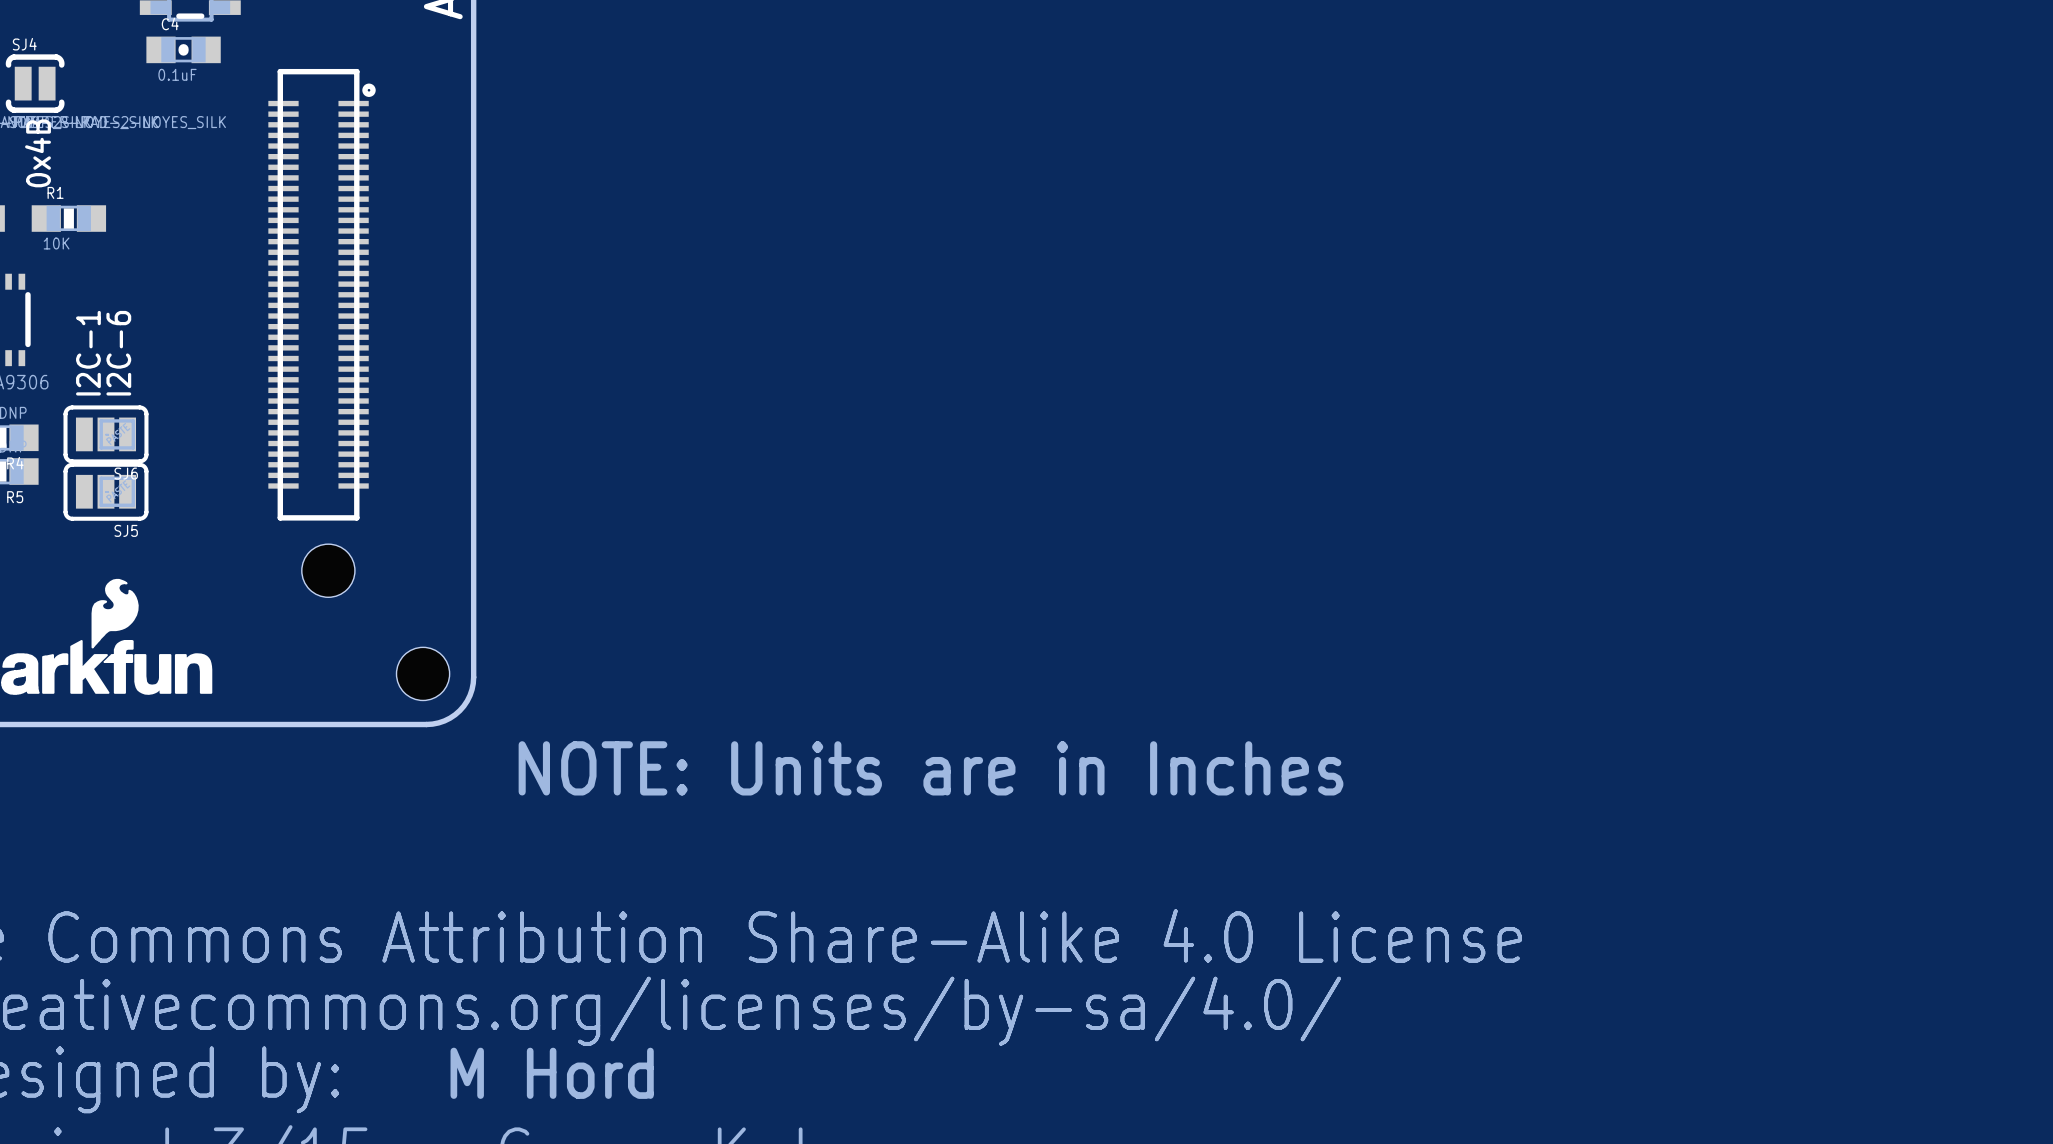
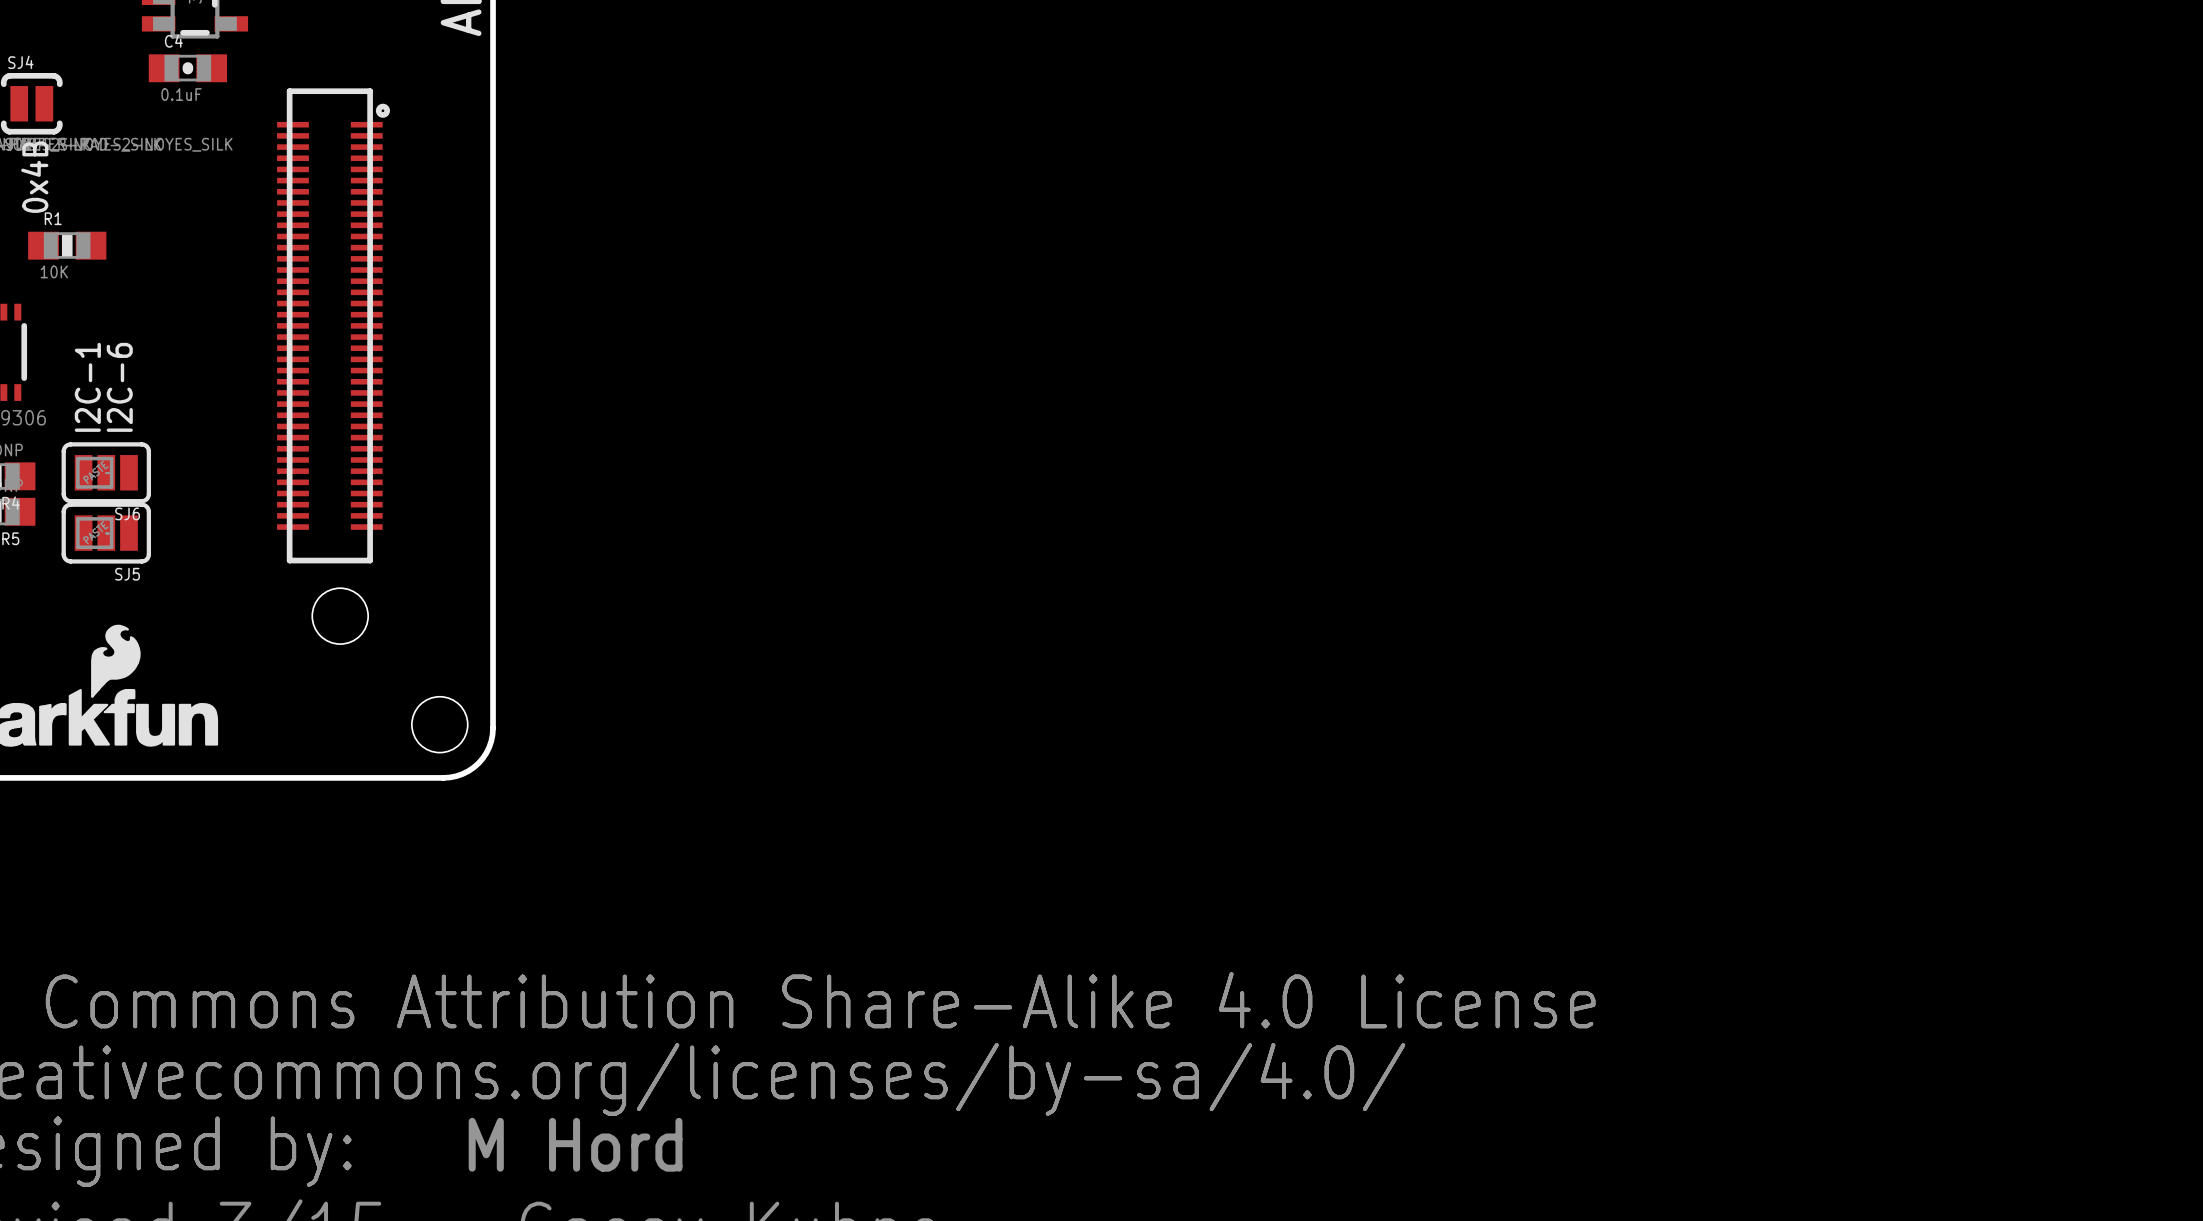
SJ6 footprint: [63, 405, 149, 464] -> [61, 442, 151, 504]
SJ5 footprint: [63, 462, 149, 521] -> [61, 502, 151, 564]
text: NOTE: Units are in Inches (930, 768) -> none

